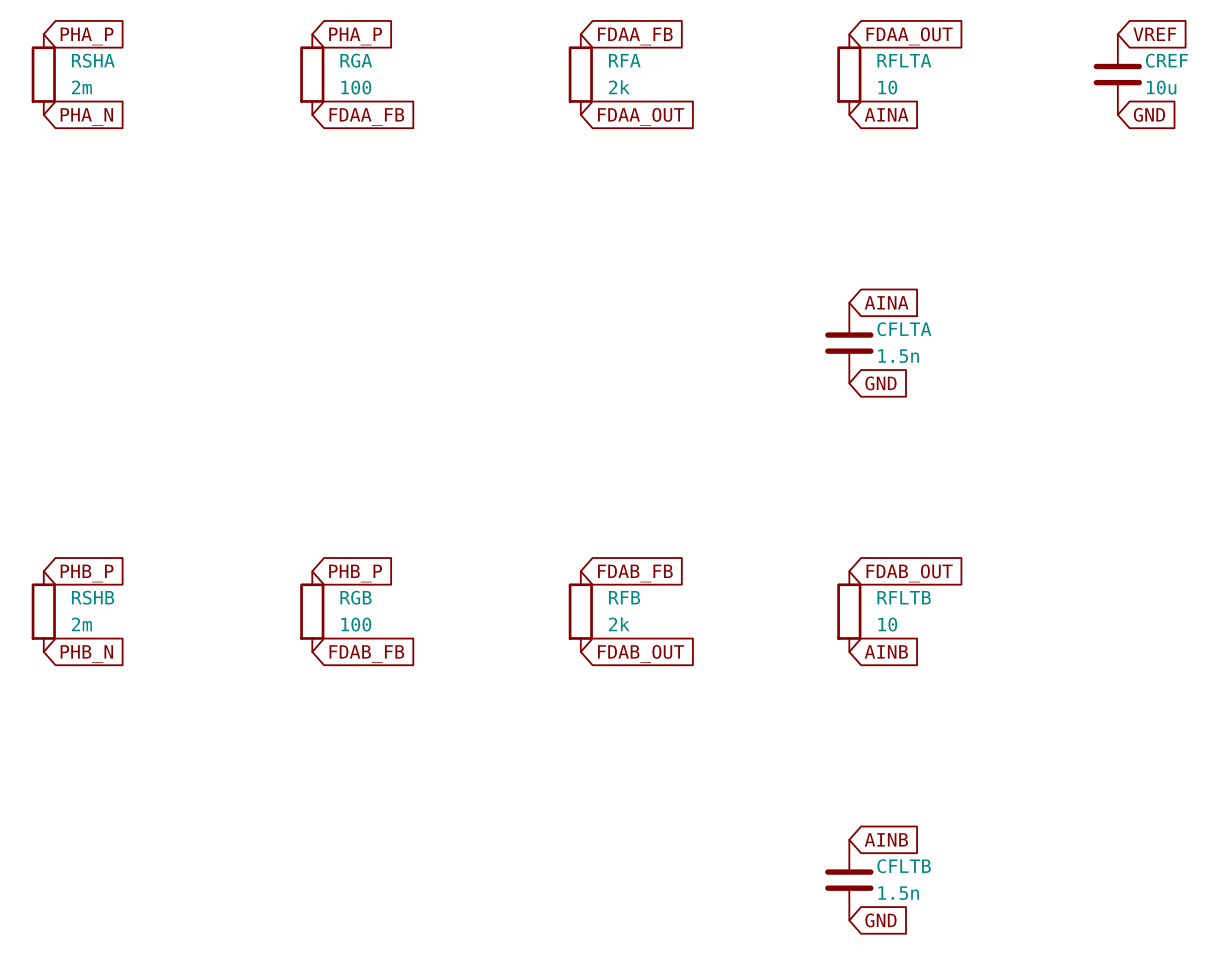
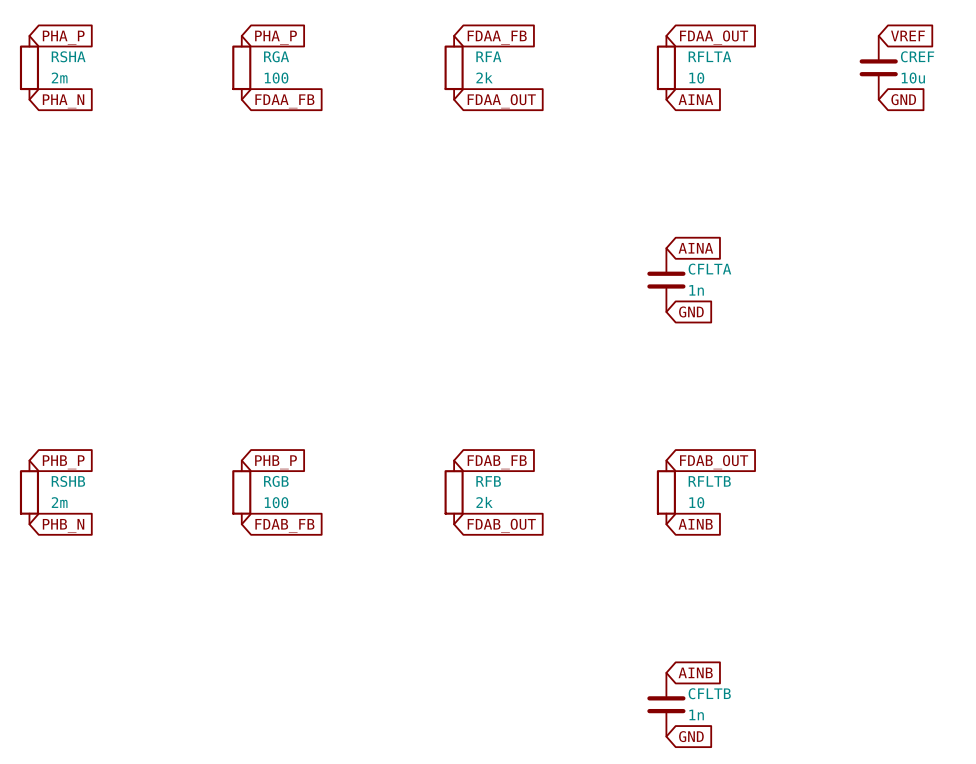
CFLTA value: 1.5n (898, 356) -> 1n (696, 290)
CFLTB value: 1.5n (898, 893) -> 1n (696, 714)

